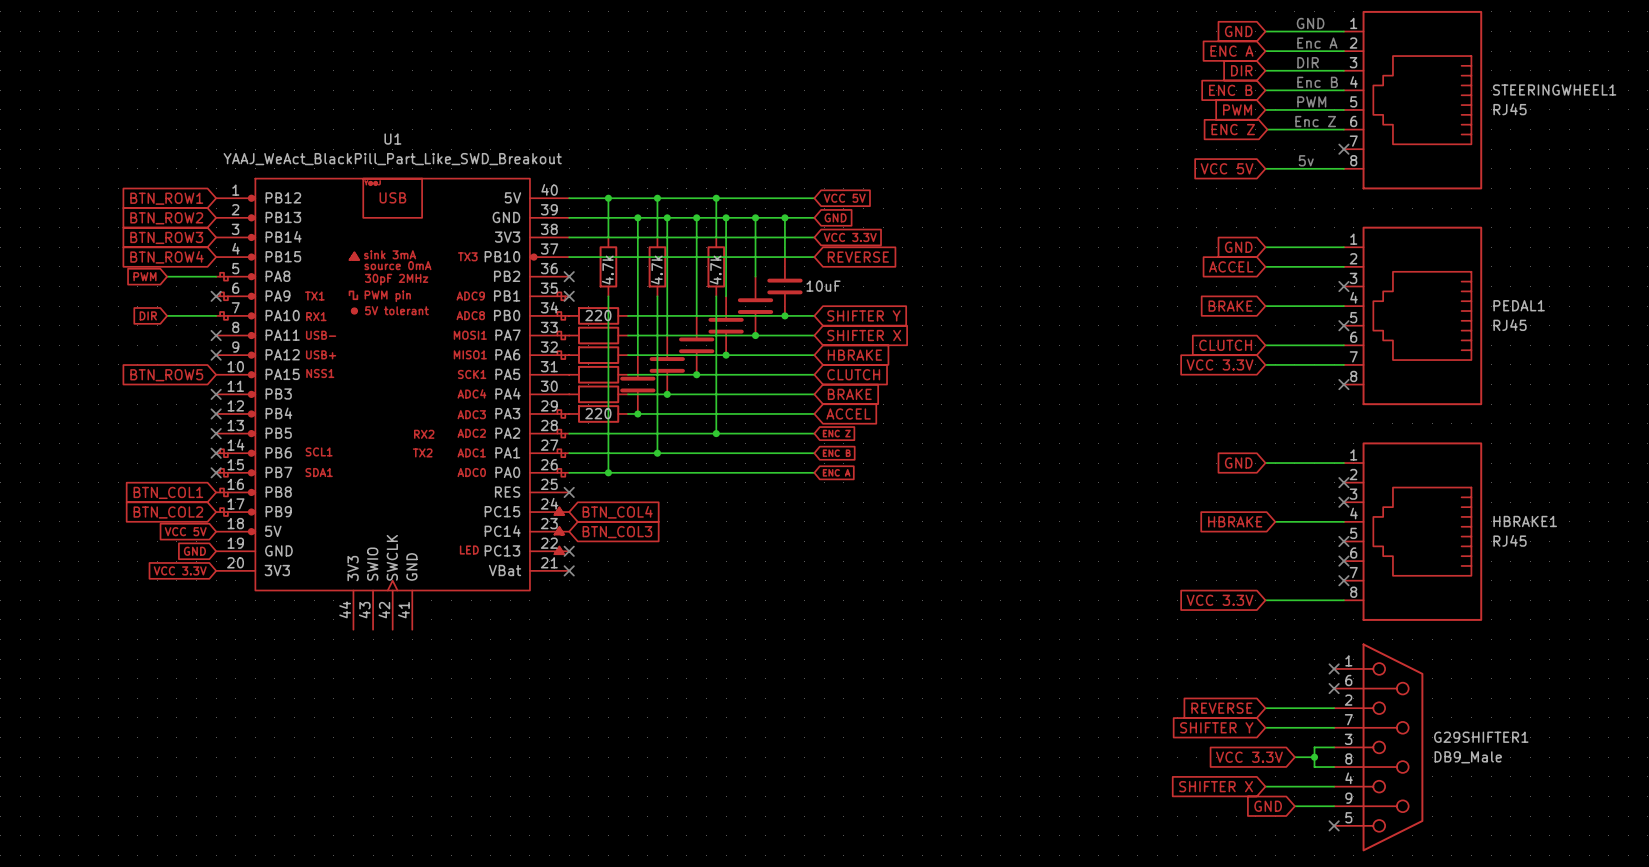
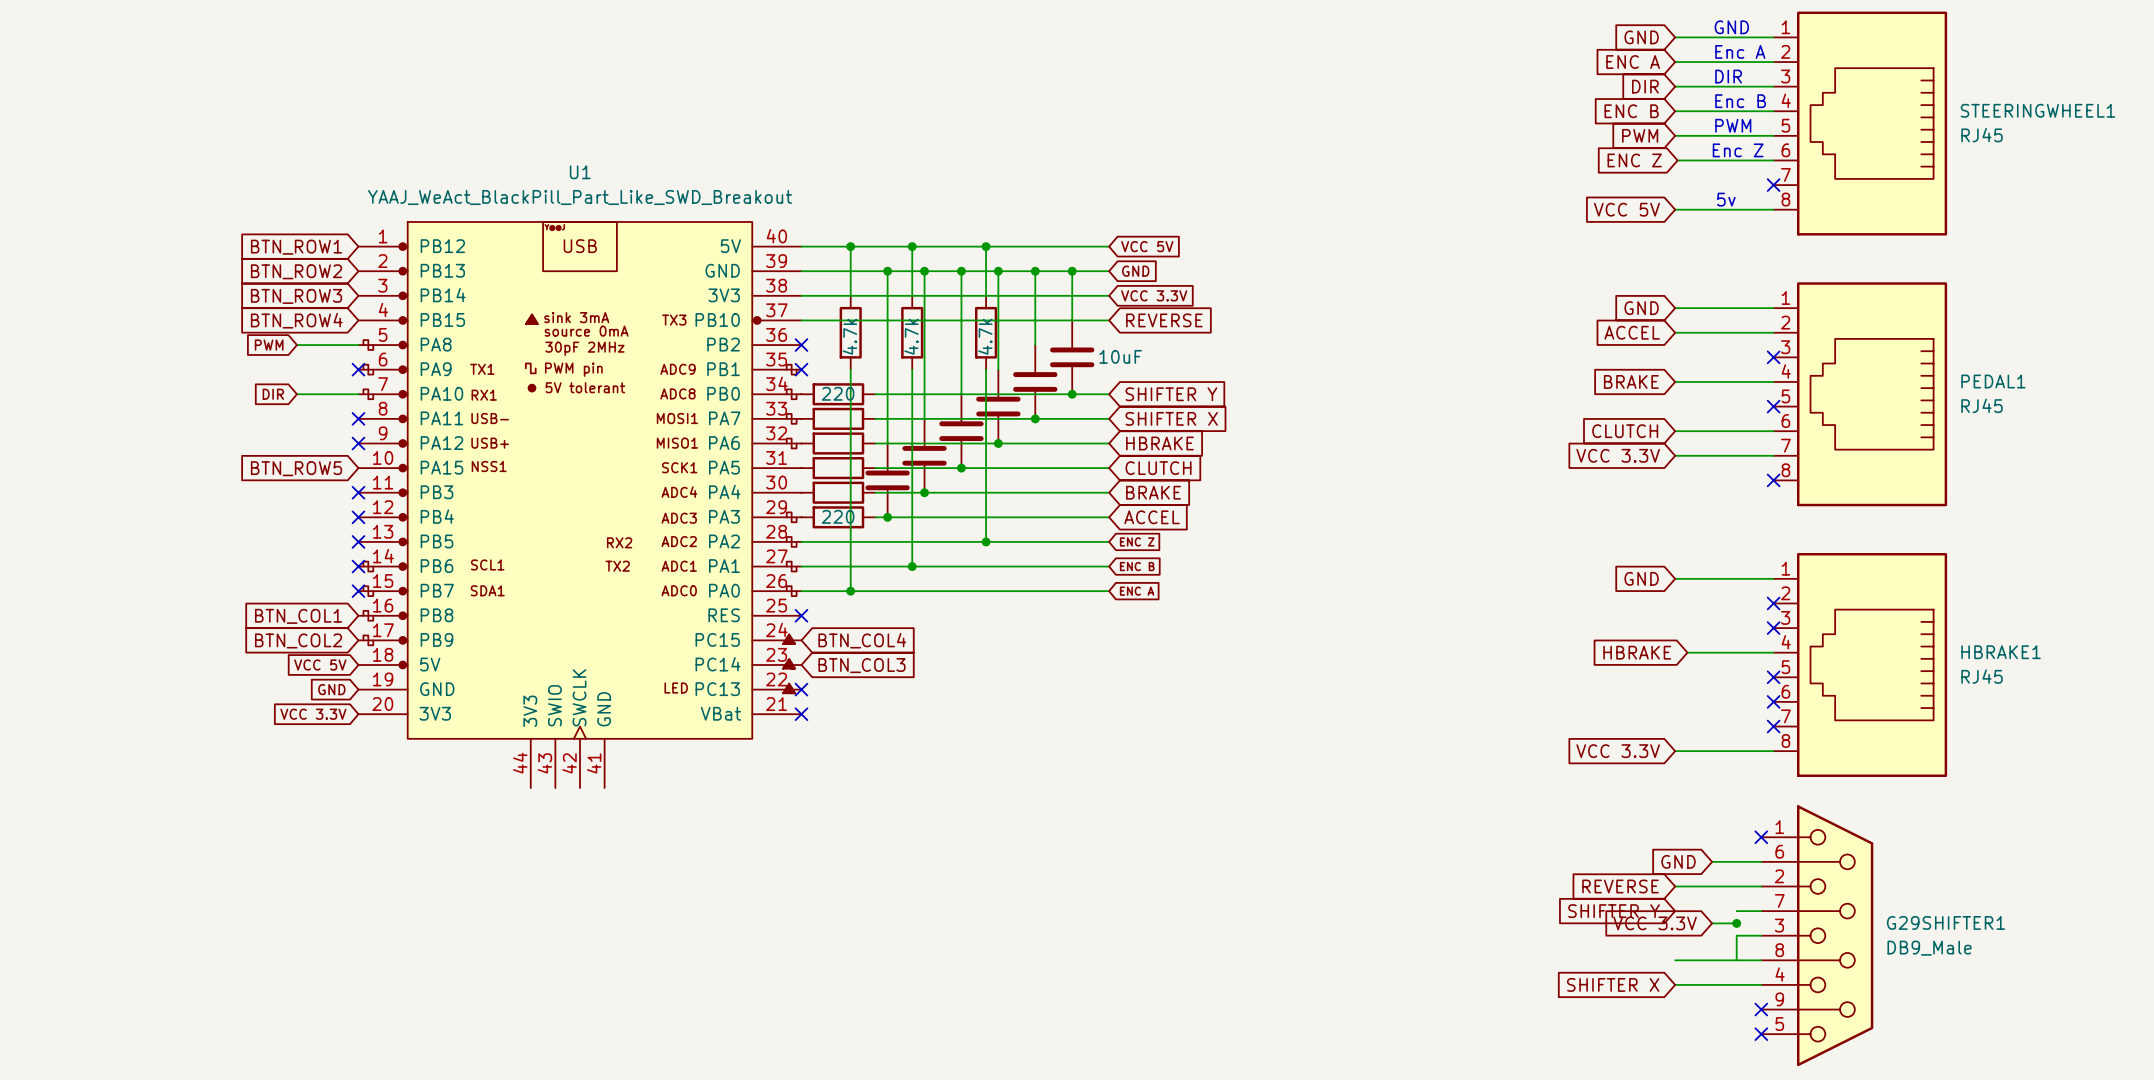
no-connect mark: (1334, 688) -> none
wire: (1265, 727) (1314, 727) -> (1675, 960) (1736, 960)
global label position: VCC 3.3V (1249, 757) -> VCC 3.3V (1655, 923)
wire: (1294, 757) (1314, 757) -> (1712, 923) (1736, 923)
junction position: (1314, 757) -> (1736, 923)
global label position: GND (1268, 806) -> GND (1678, 861)
wire: (1294, 806) (1334, 806) -> (1712, 861) (1761, 861)
no-connect mark: none -> (1761, 1009)

